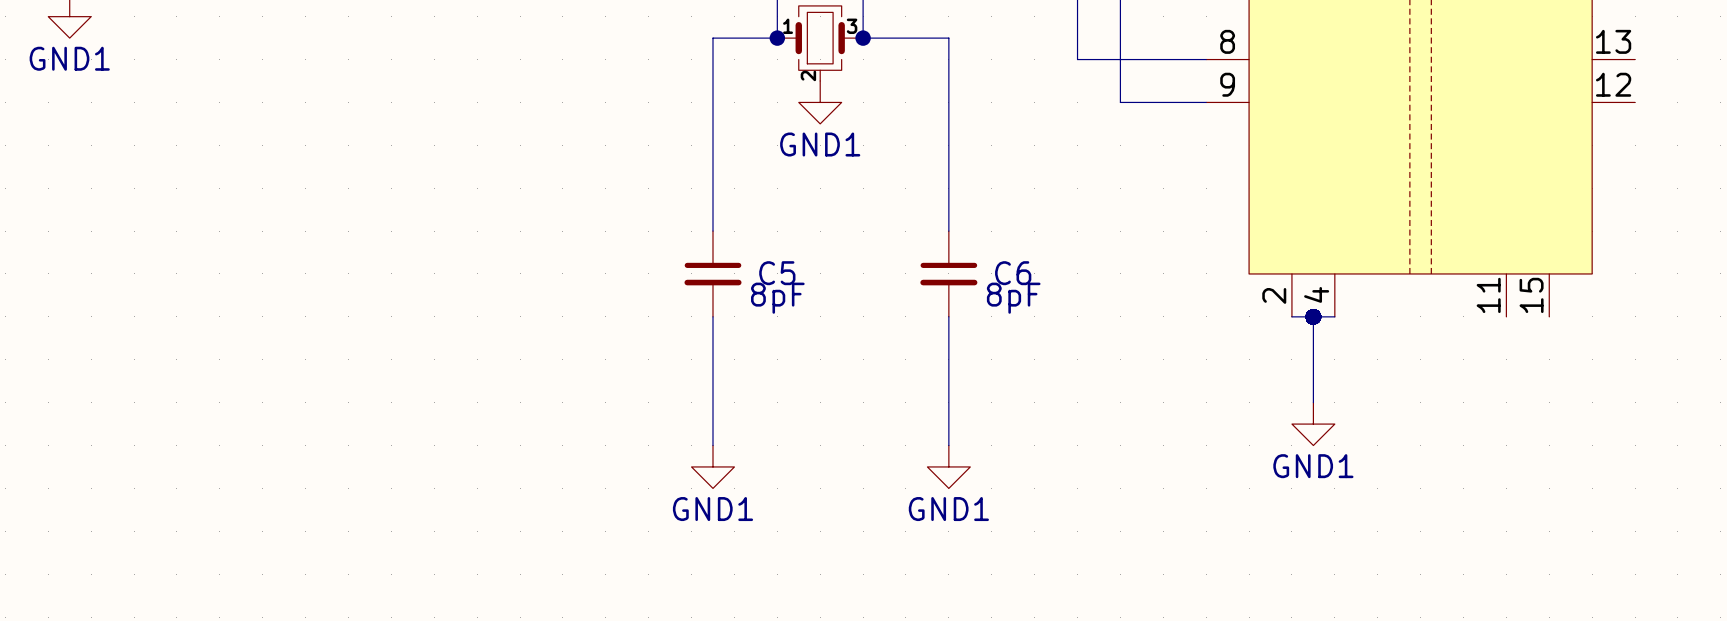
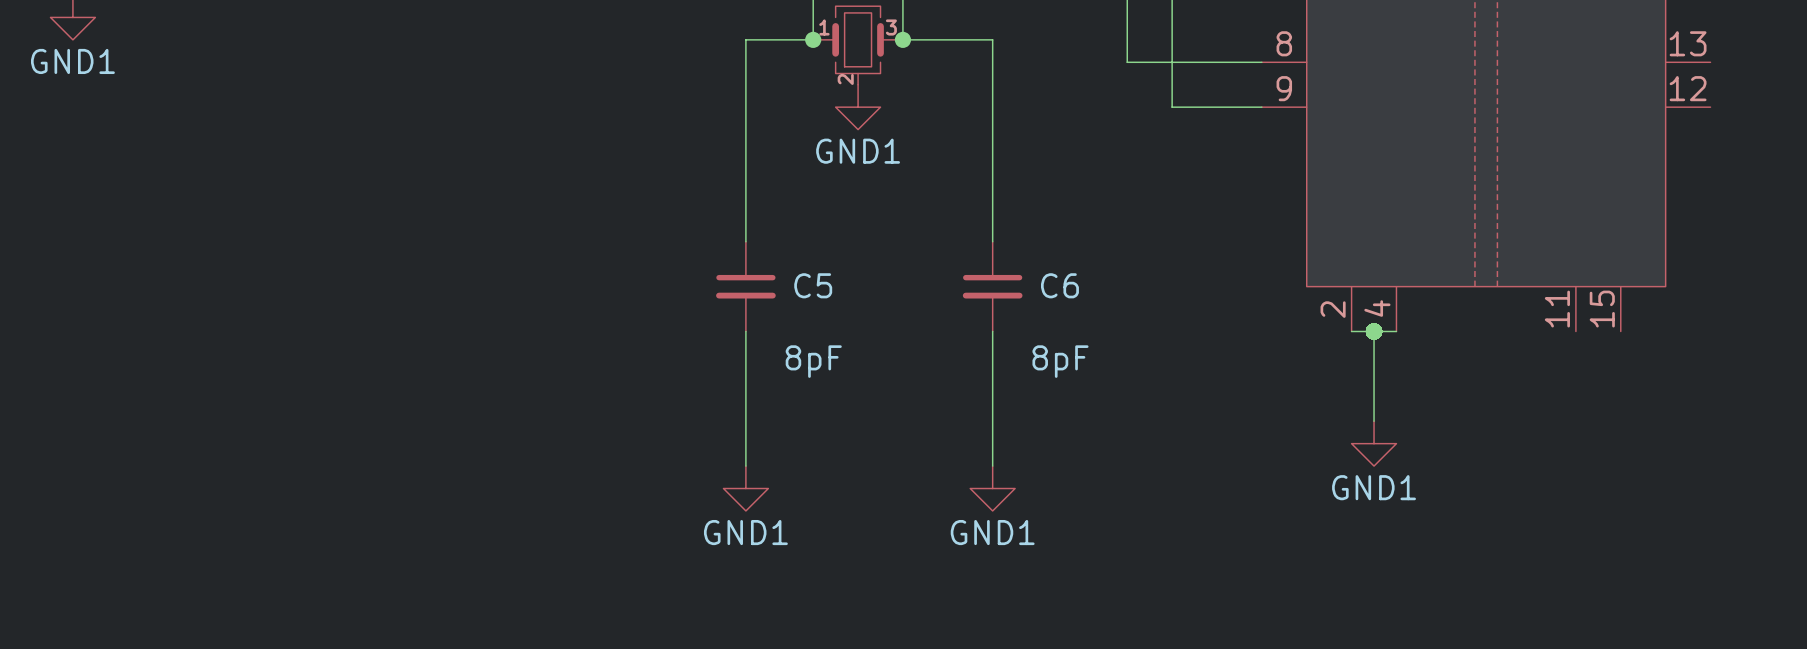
C5 value position: 8pF (777, 298) -> 8pF (813, 361)
C6 value position: 8pF (1013, 298) -> 8pF (1060, 361)

